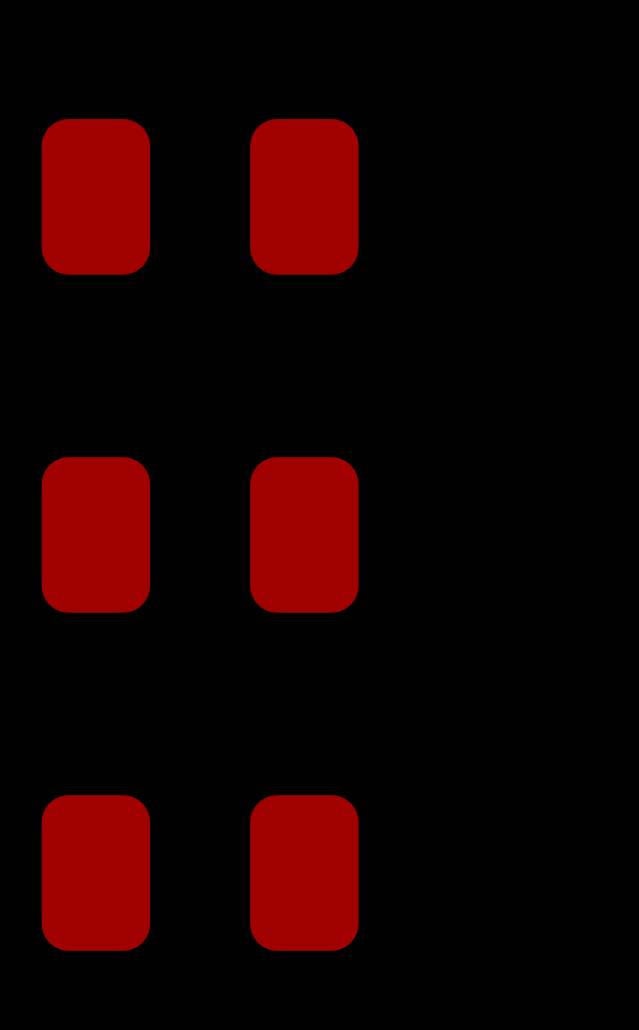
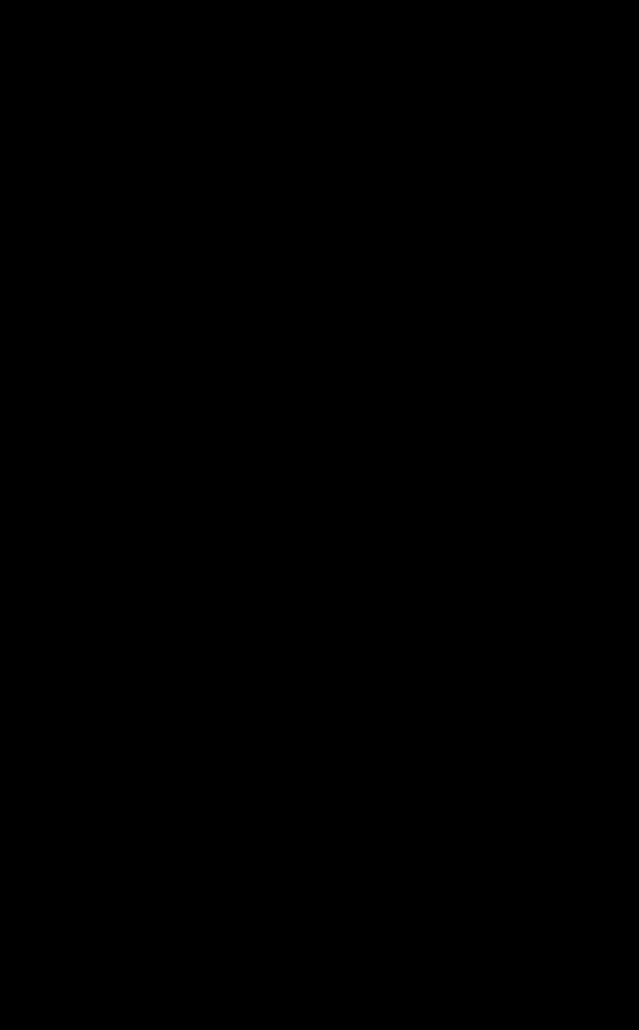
part: (200, 196) -> none
part: (200, 534) -> none
part: (200, 873) -> none

